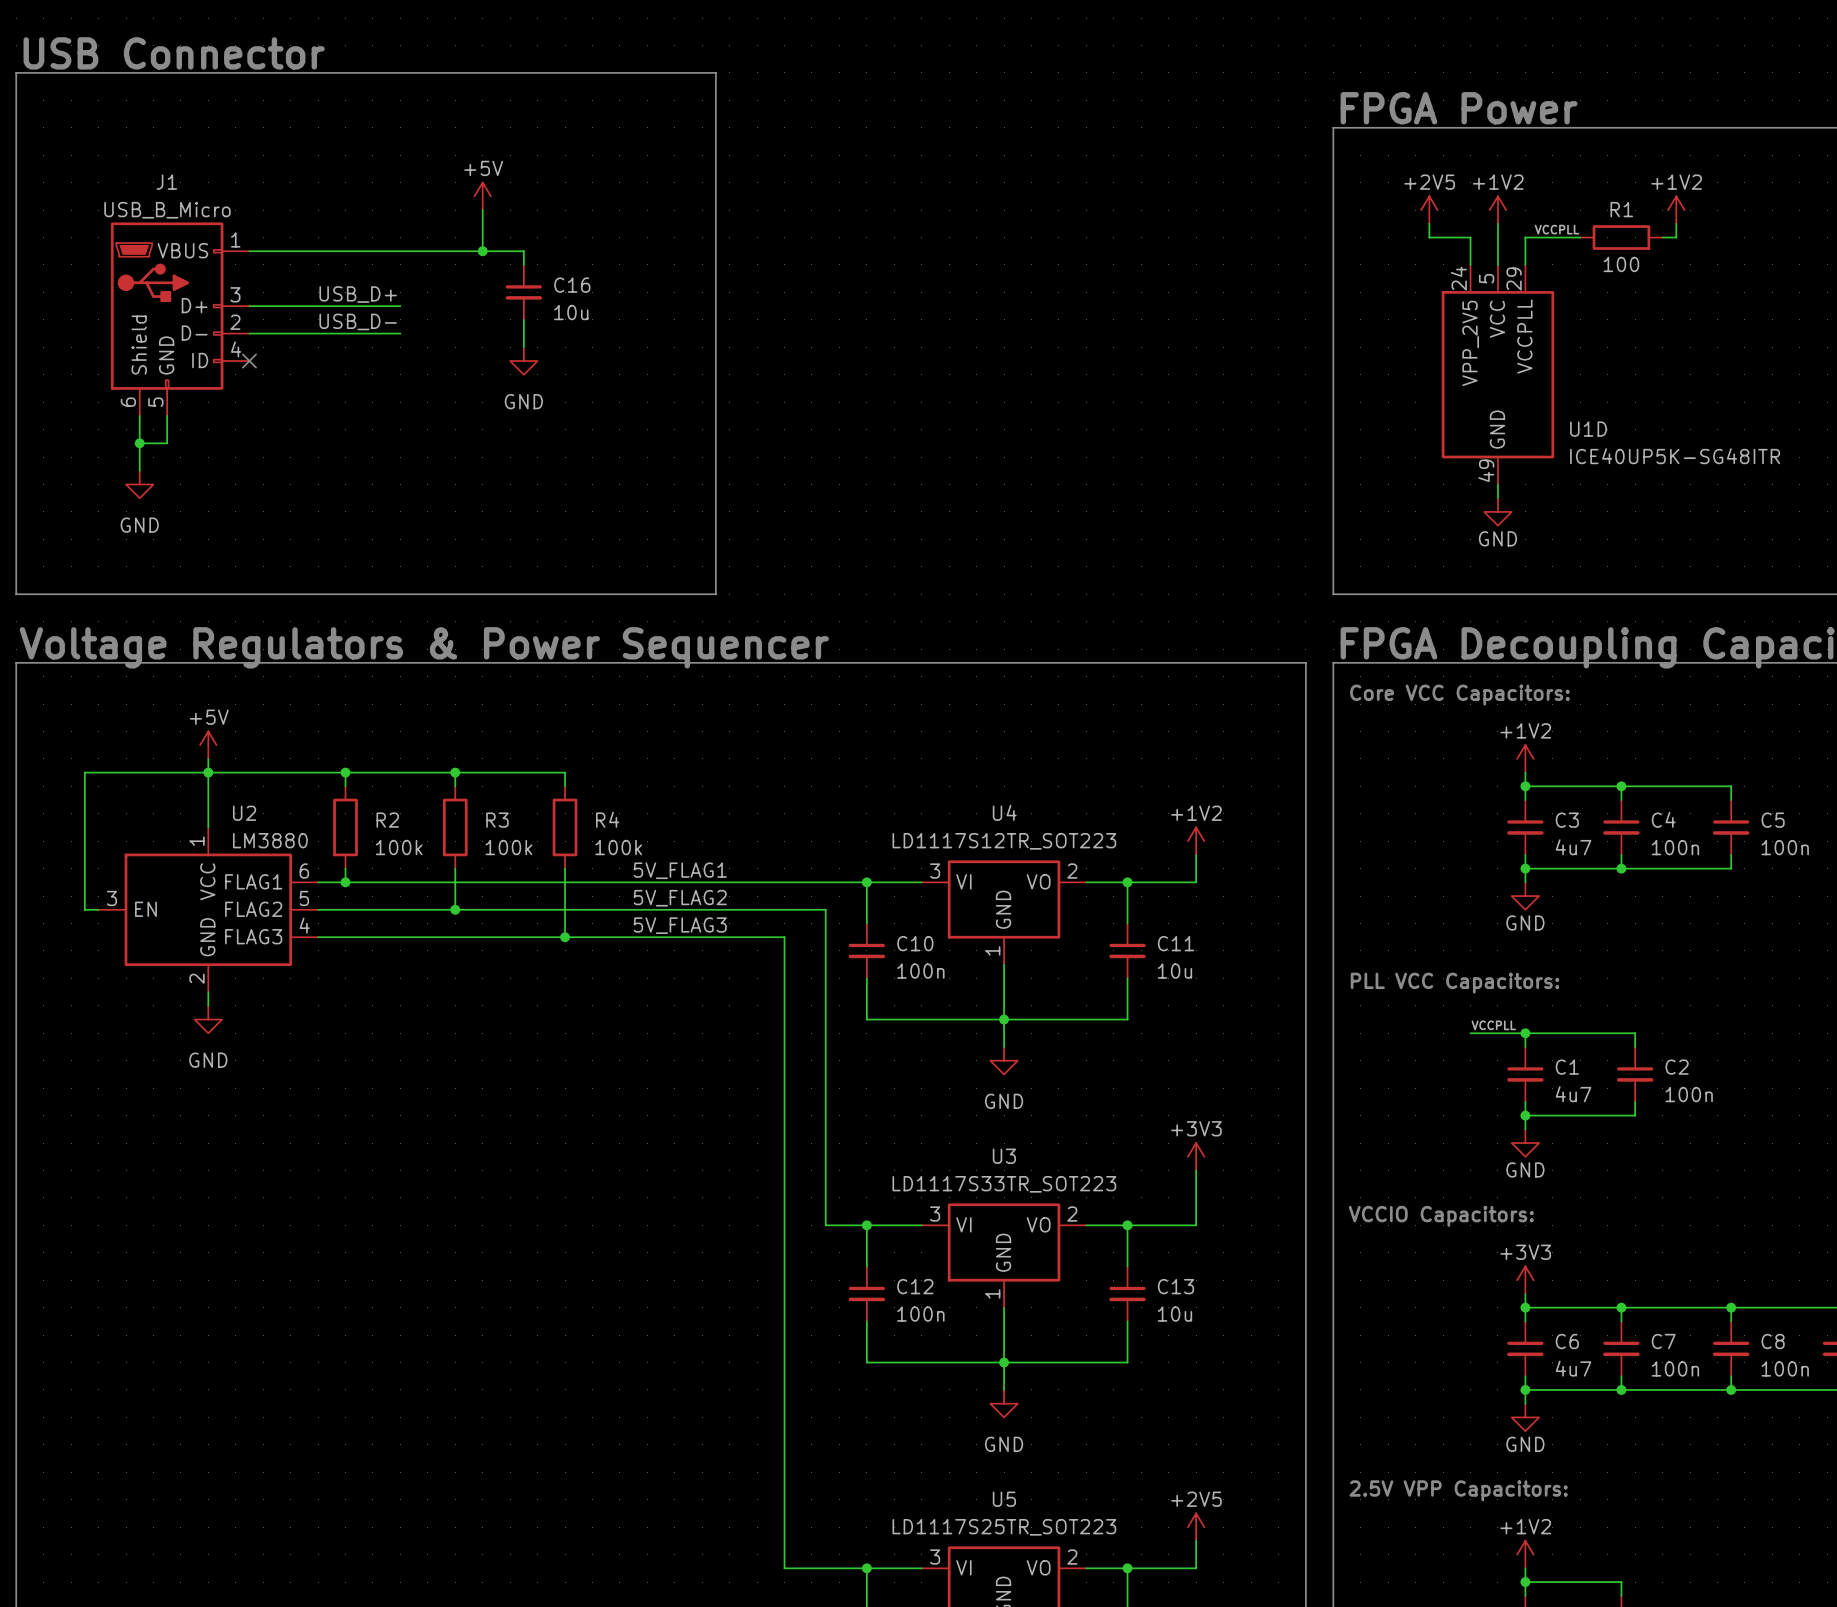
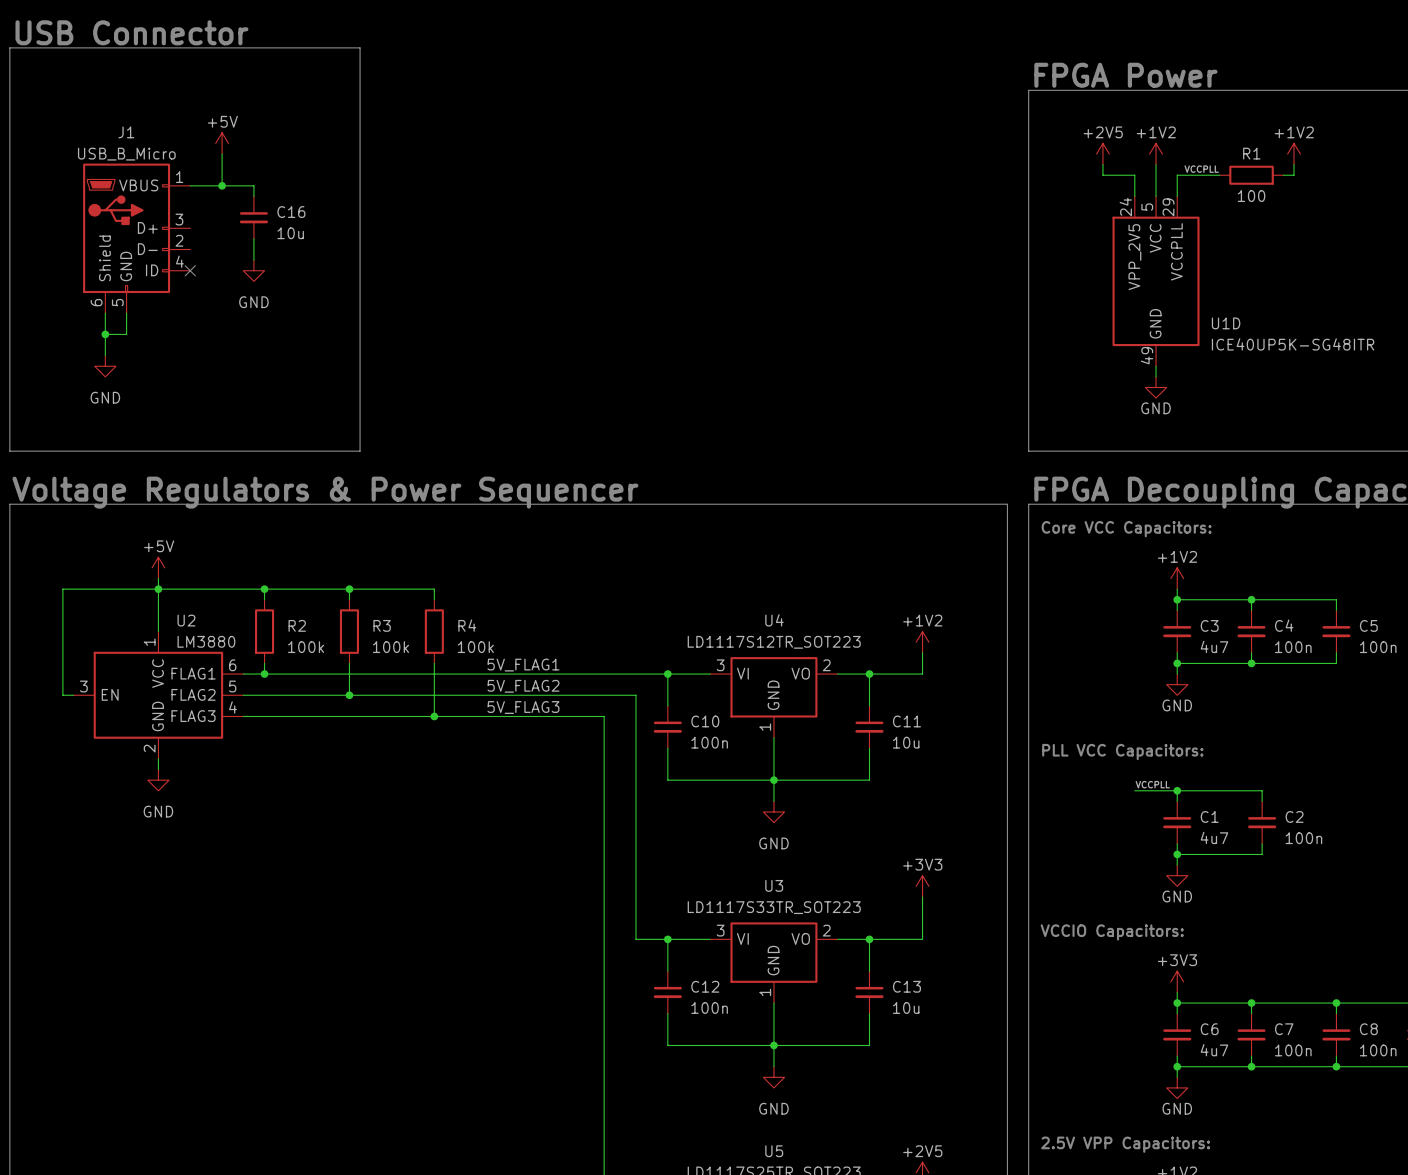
line: (468, 72) (715, 72) (715, 594) (468, 594) -> (360, 47) (360, 451)
power symbol position: +5V (482, 196) -> +5V (222, 143)
wire: (482, 210) (482, 251) -> (222, 154) (222, 185)
junction: none -> (222, 185)
wire: (331, 251) (523, 251) (523, 264) -> (253, 185) (253, 196)
junction: (482, 251) -> none
C16 position: (523, 292) -> (253, 217)
label: USB_D+ (358, 294) -> none
wire: (249, 306) (400, 306) -> none
wire: (523, 319) (523, 347) -> (253, 238) (253, 260)
label: USB_D- (358, 321) -> none
wire: (249, 333) (400, 333) -> none
power symbol position: GND (523, 361) -> GND (253, 270)

